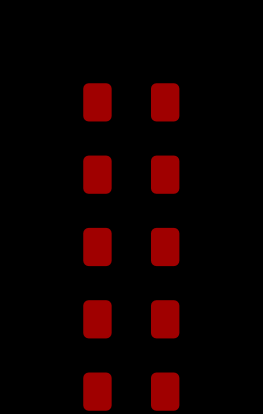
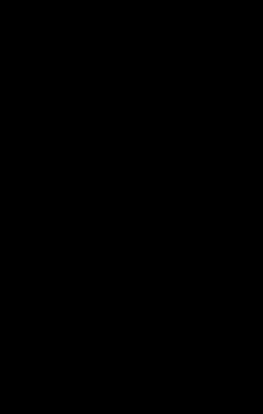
part: (131, 102) -> none
part: (131, 174) -> none
part: (131, 246) -> none
part: (131, 319) -> none
part: (131, 391) -> none

